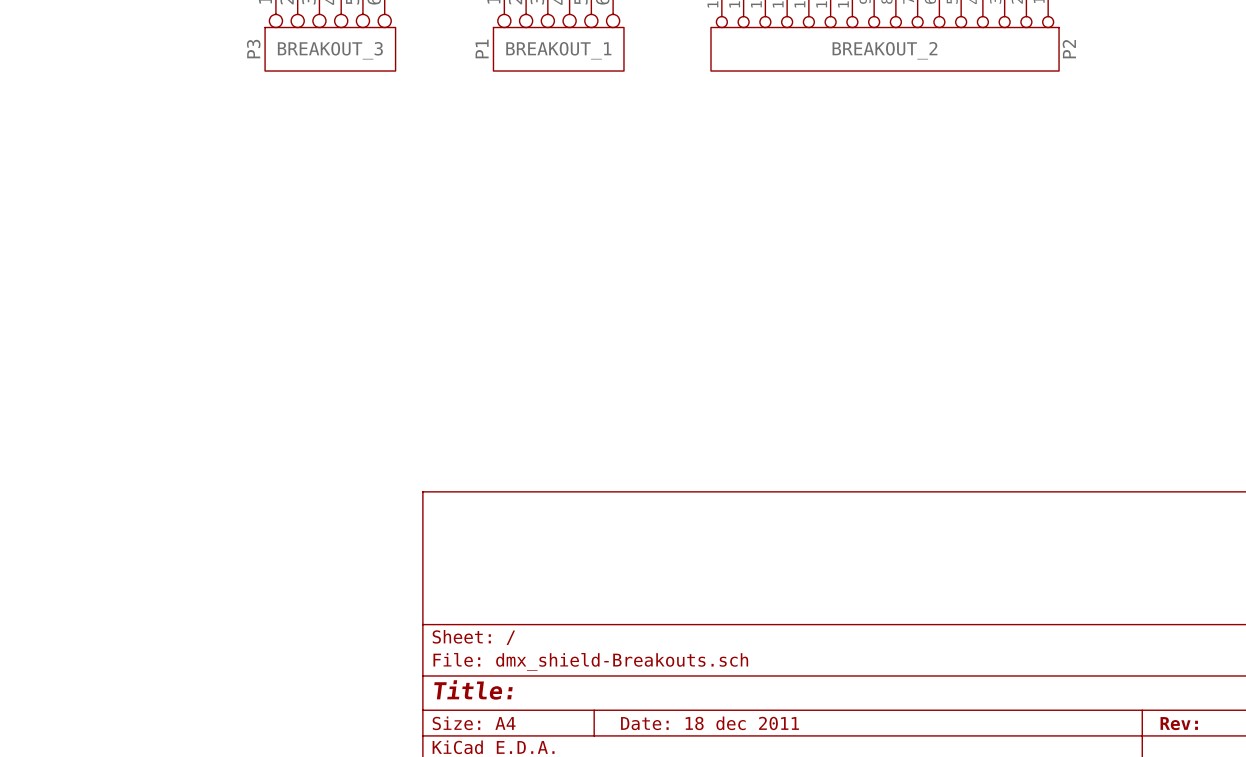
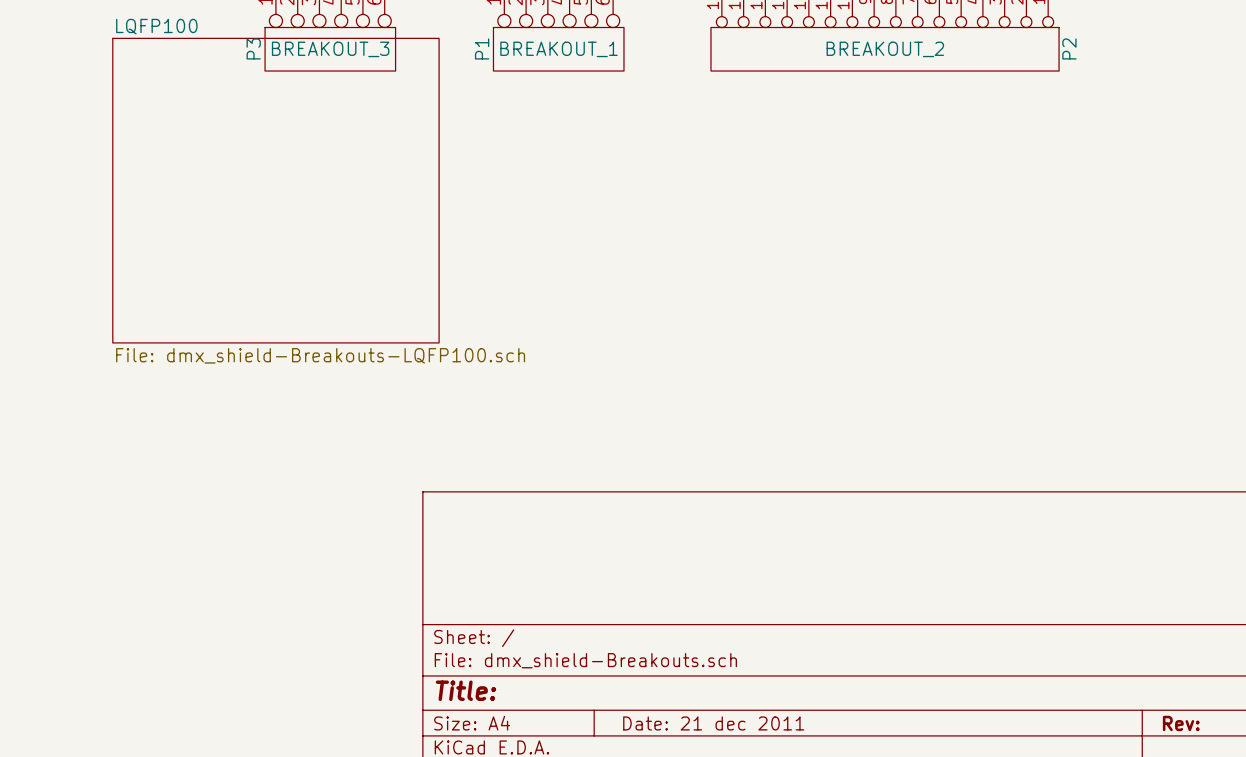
sheet LQFP100: none -> File: dmx_shield-Breakouts-LQFP100.sch (275, 190)
title block: Date: 18 dec 2011 (710, 723) -> Date: 21 dec 2011 (713, 723)

